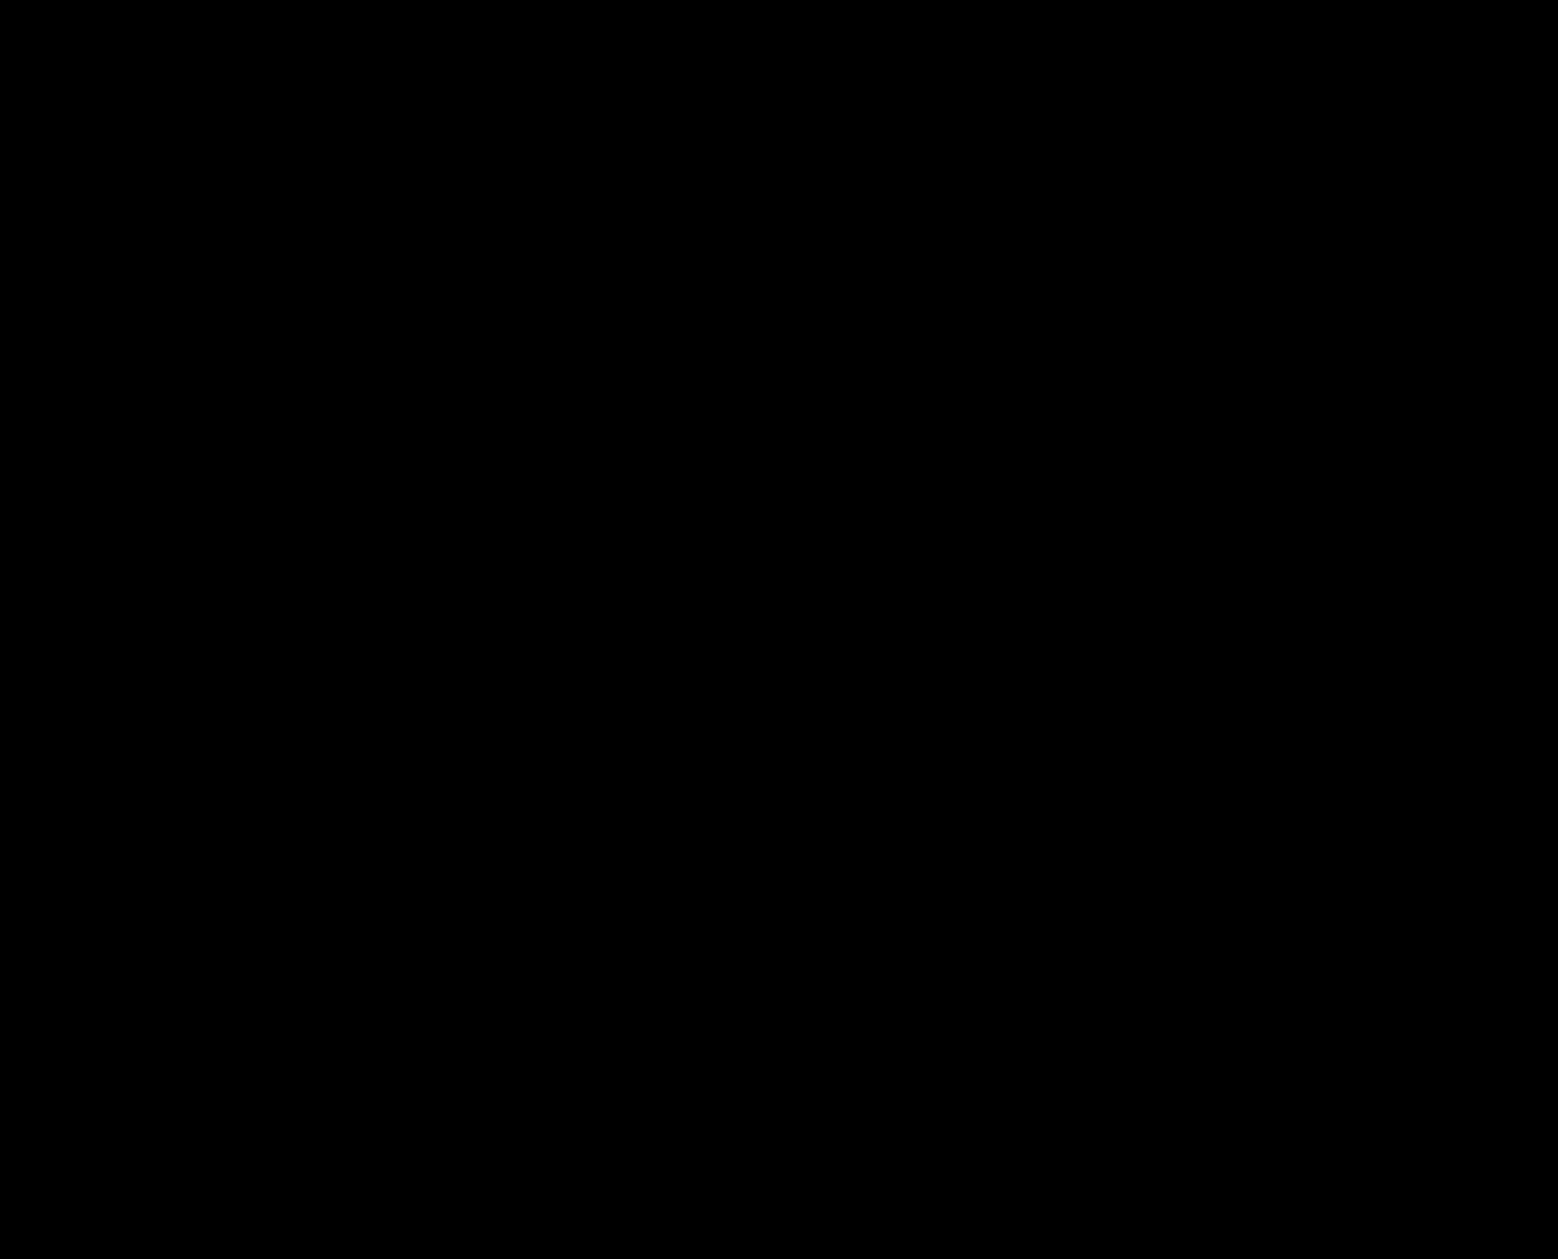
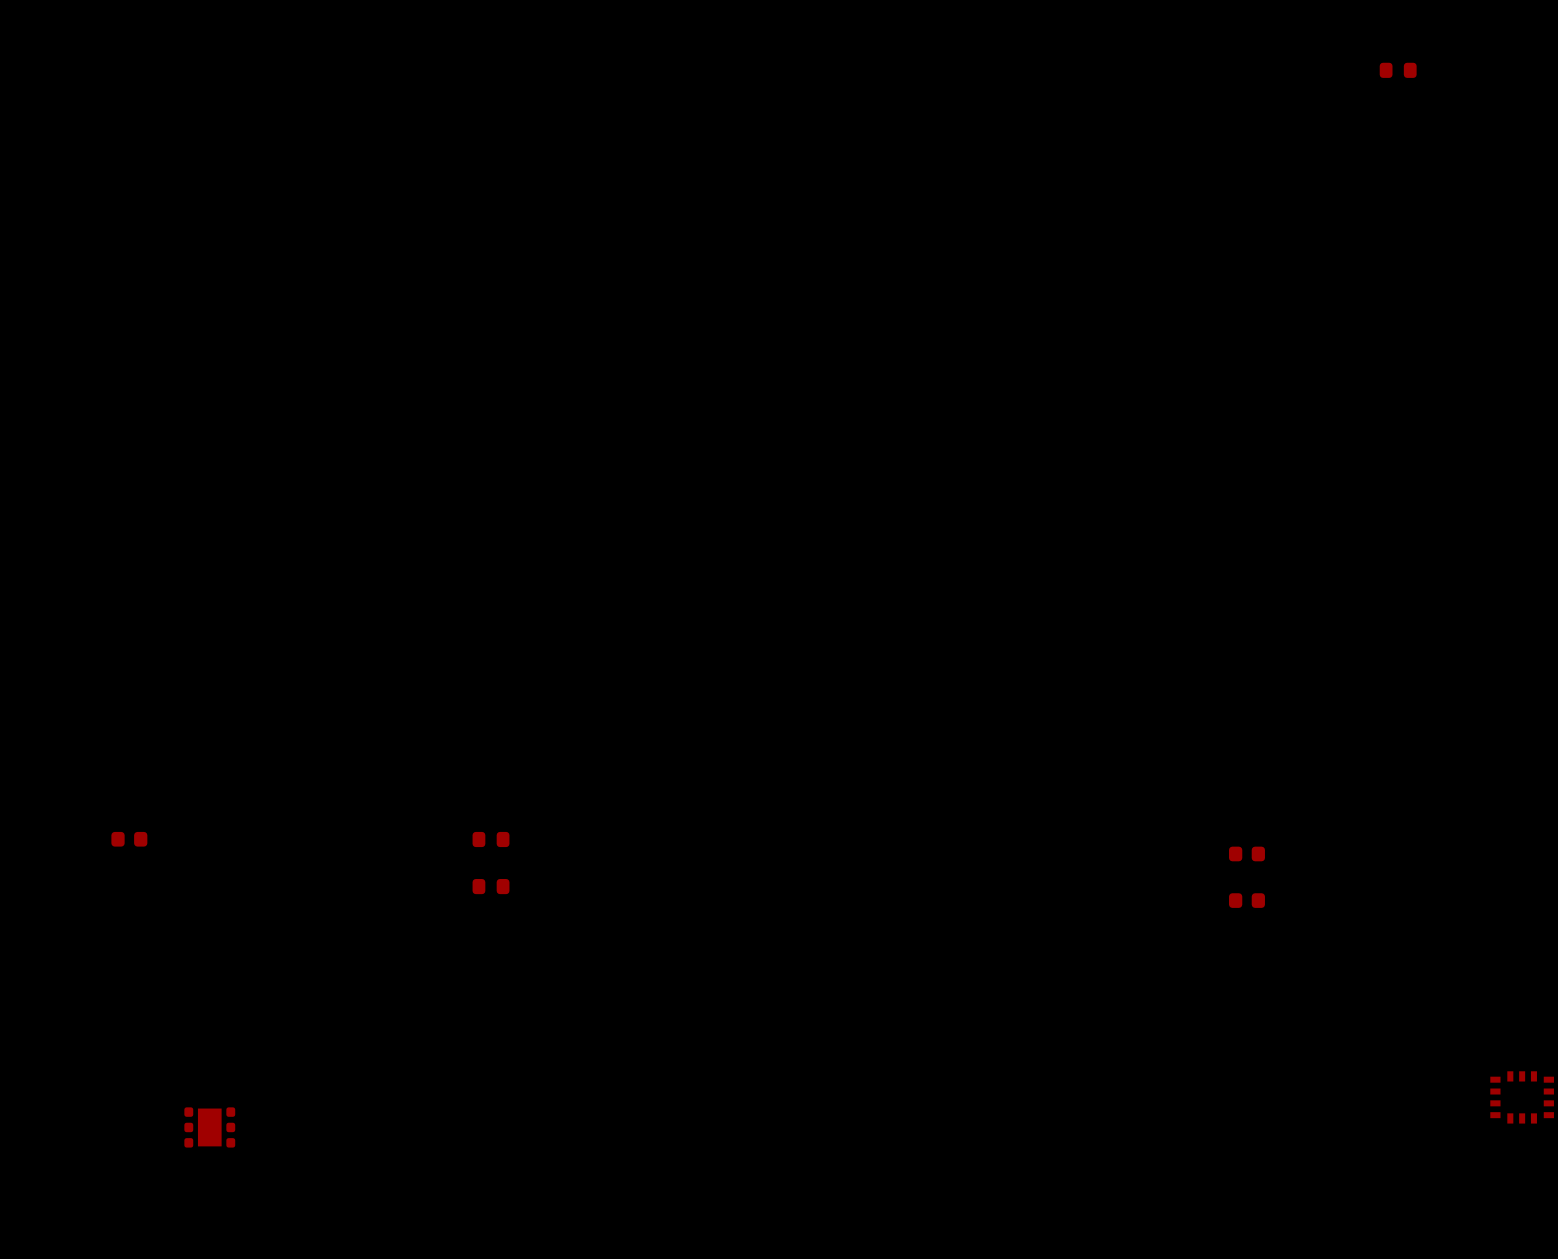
part: none -> (1398, 70)
part: none -> (129, 839)
part: none -> (491, 839)
part: none -> (1246, 853)
part: none -> (491, 886)
part: none -> (1246, 900)
part: none -> (1522, 1097)
part: none -> (209, 1127)

